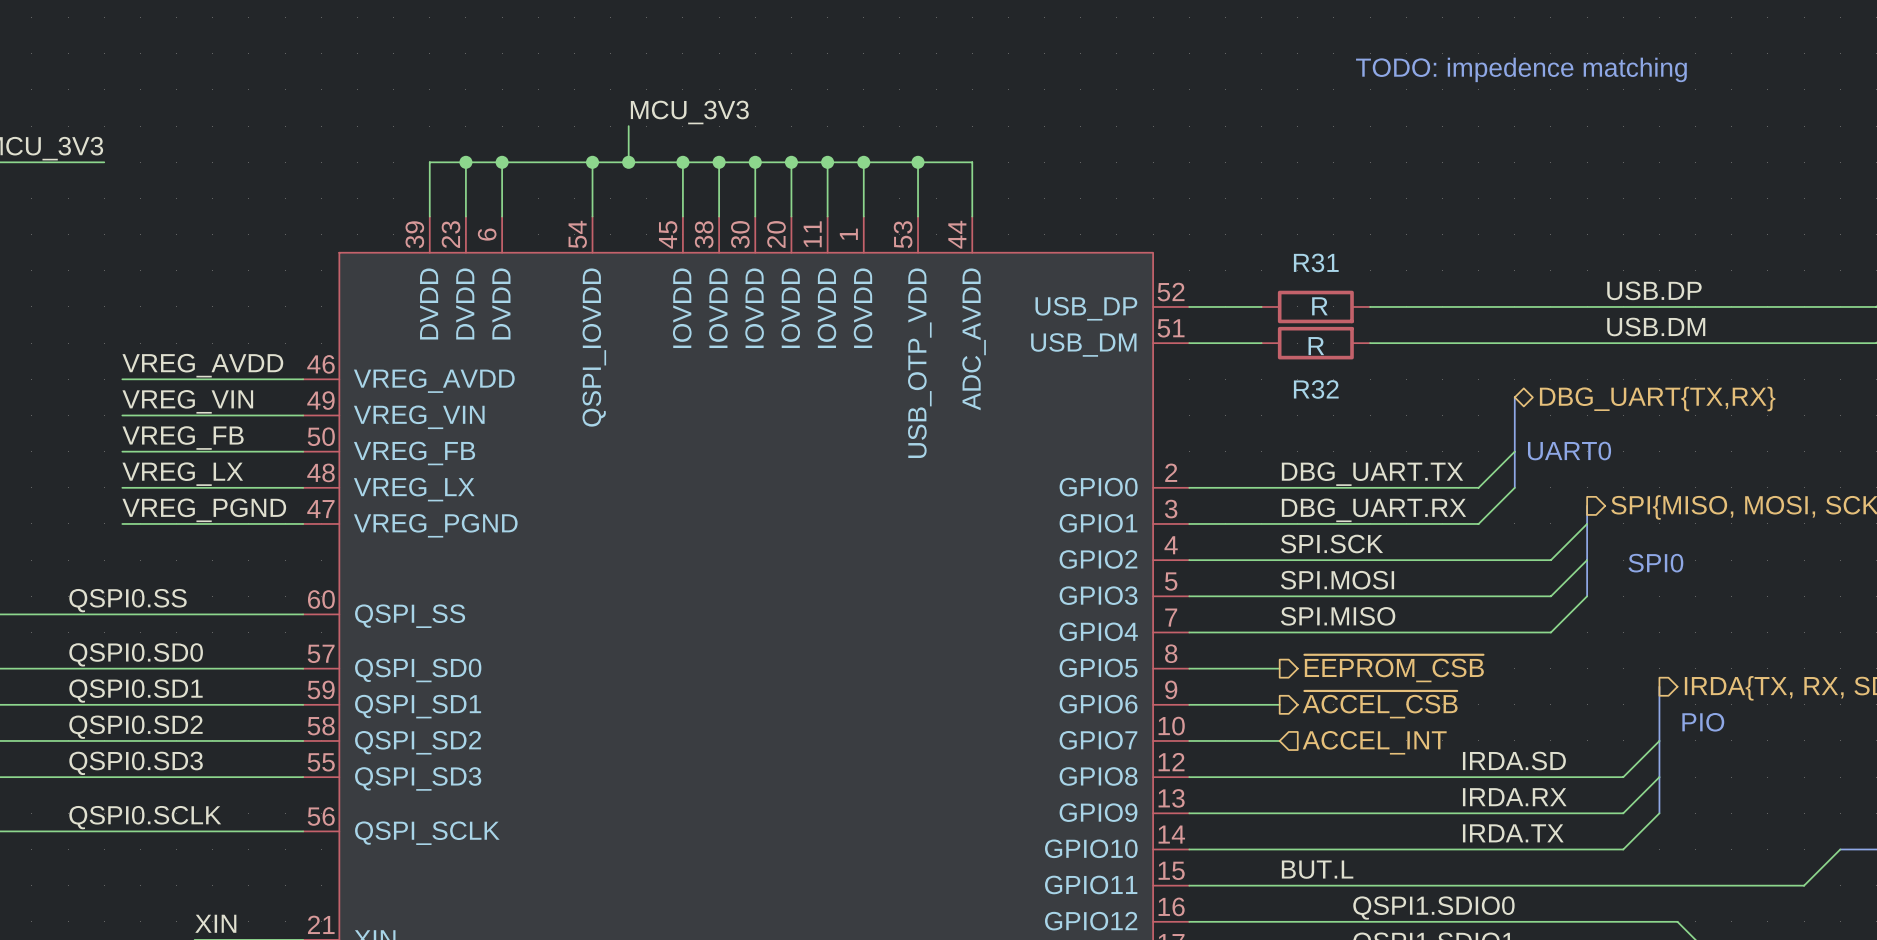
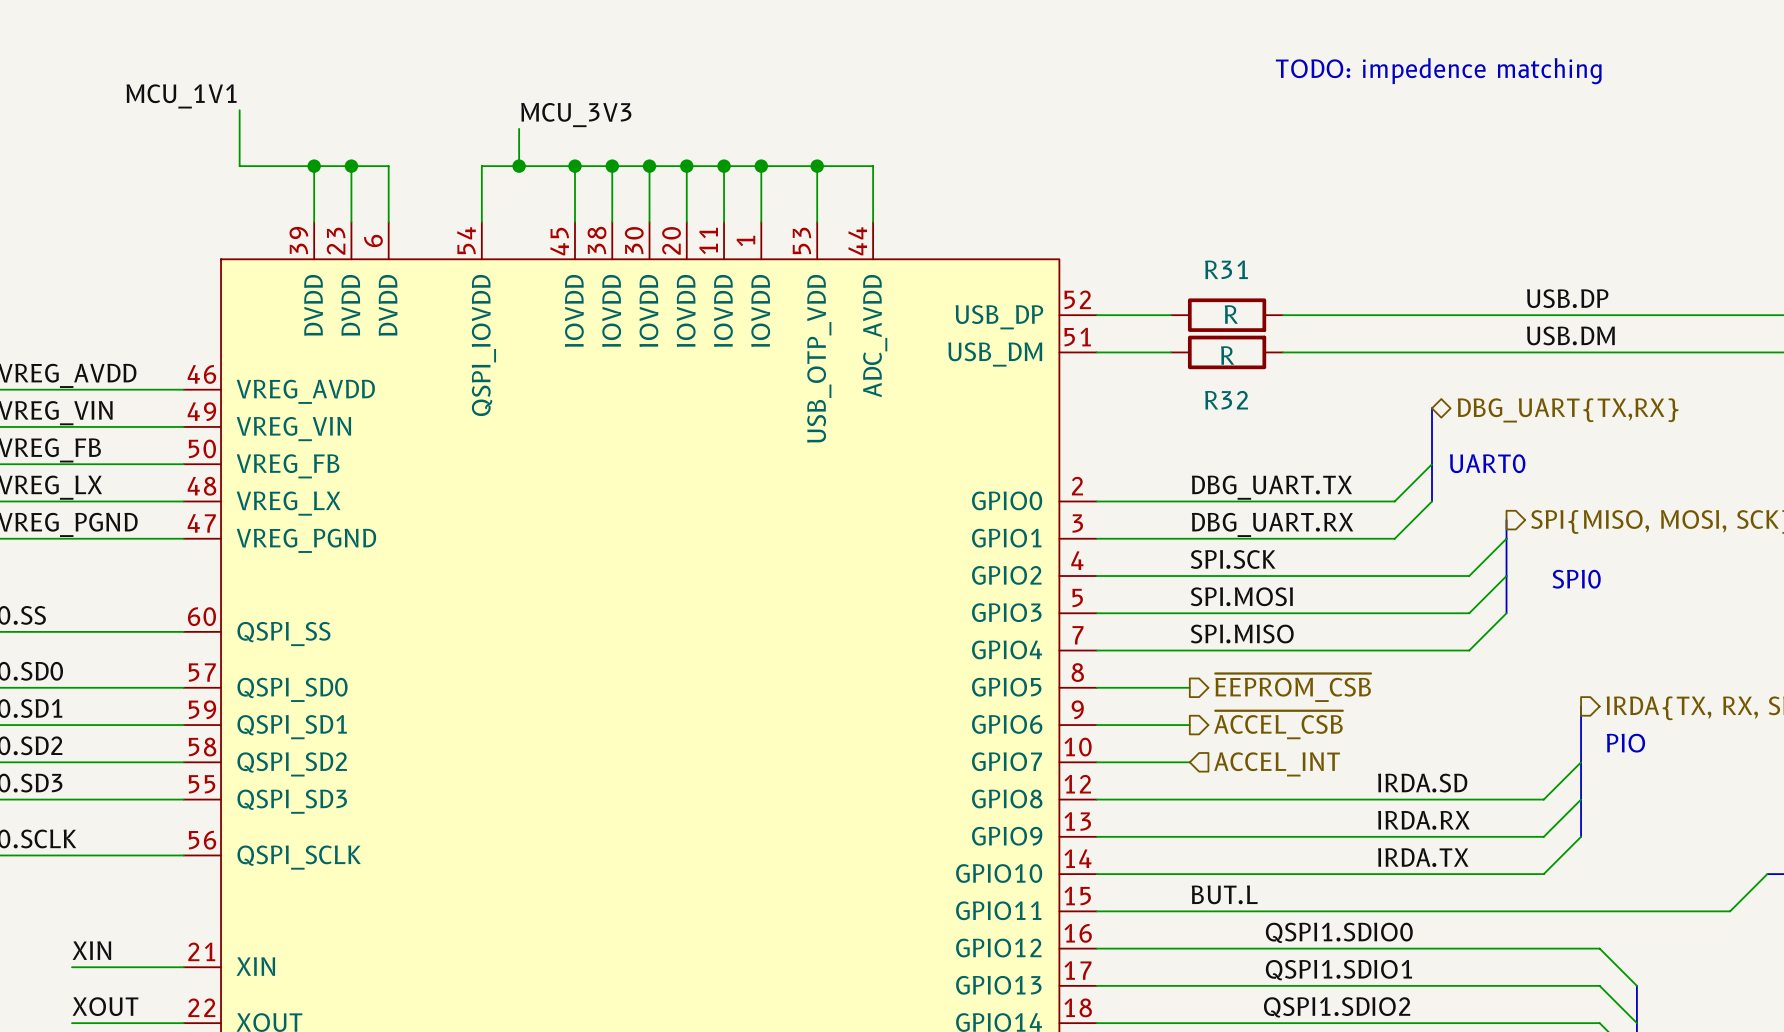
label: none -> MCU_1V1 (181, 96)
wire: none -> (239, 110) (239, 166) (314, 166)
wire: (502, 162) (592, 162) -> none
junction position: (502, 162) -> (314, 166)
junction: (592, 162) -> none

